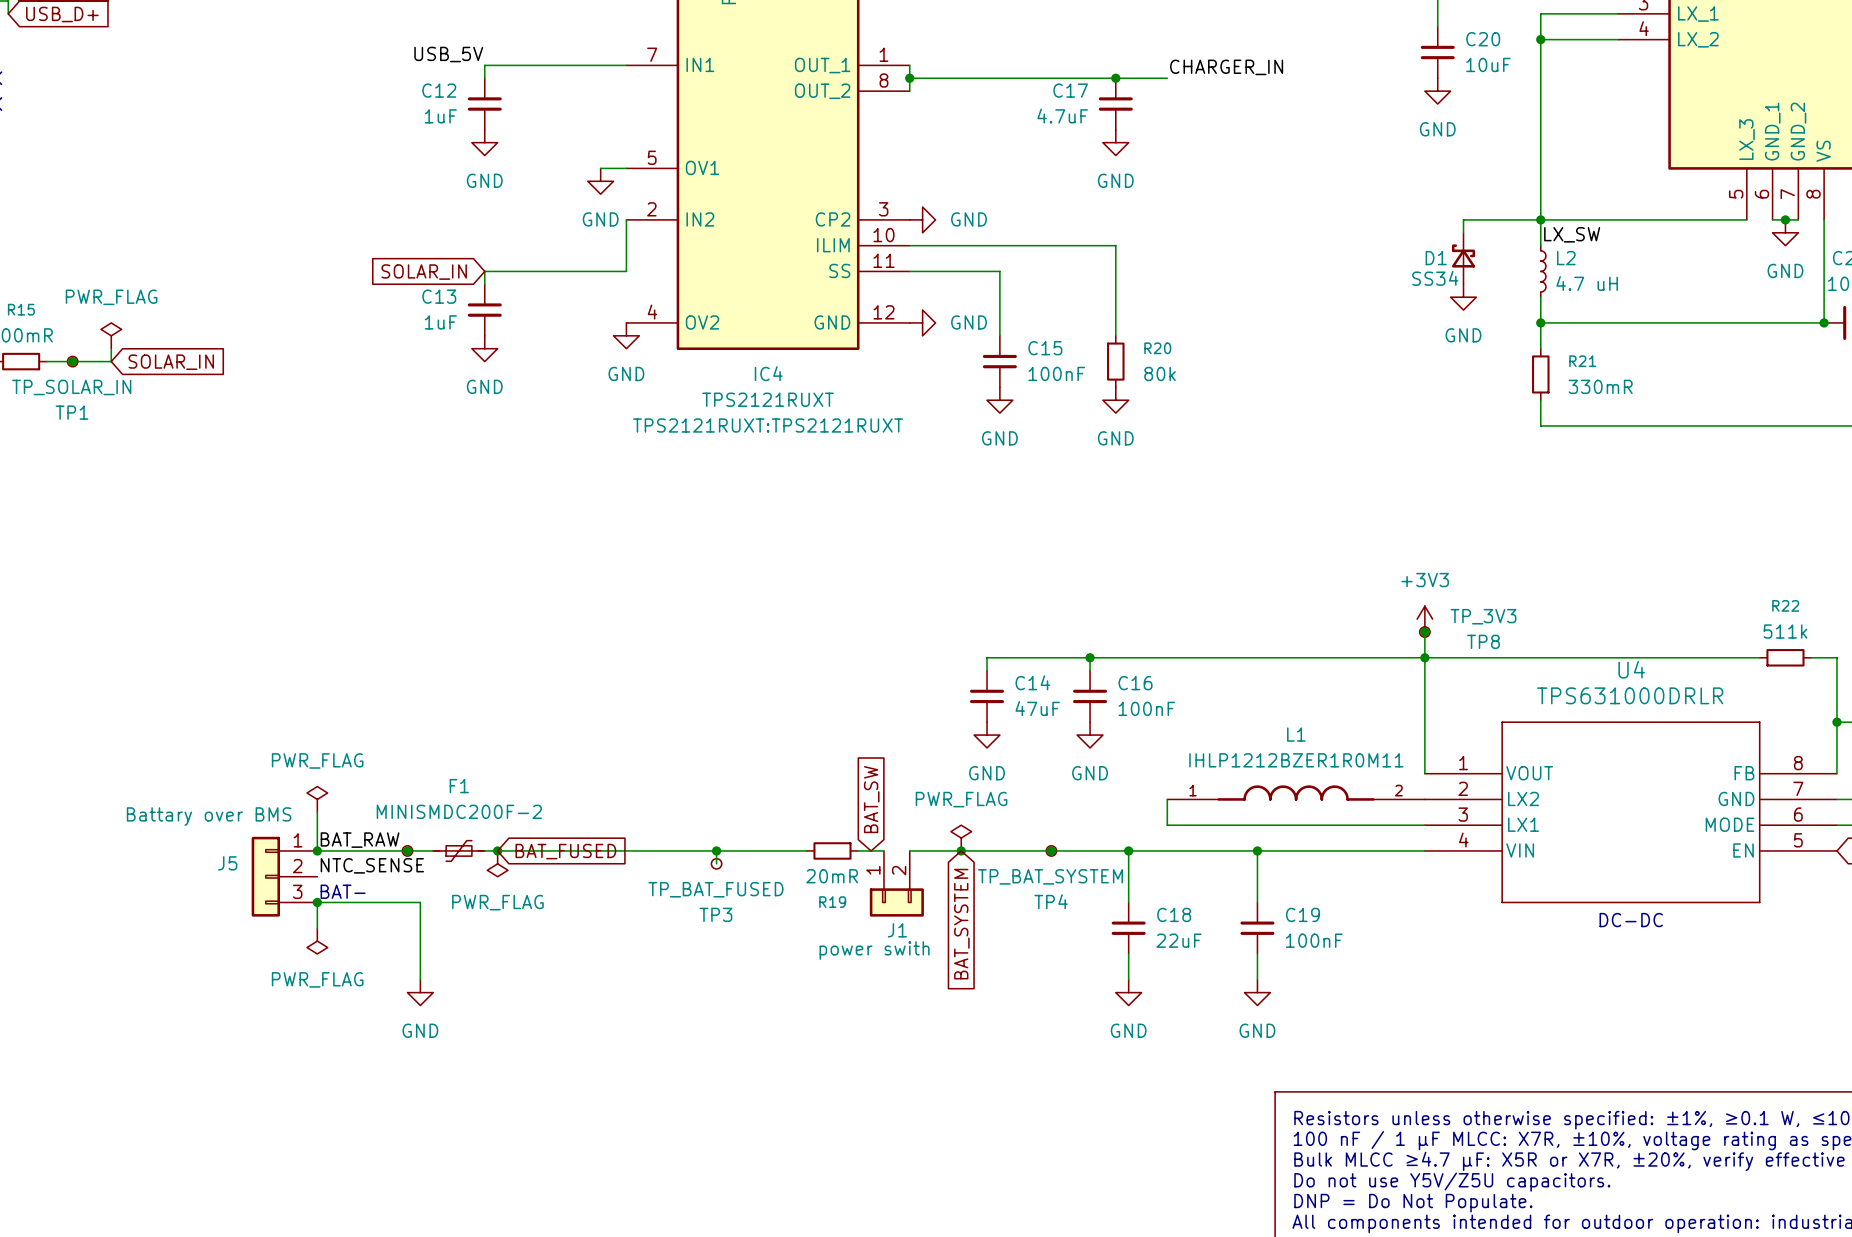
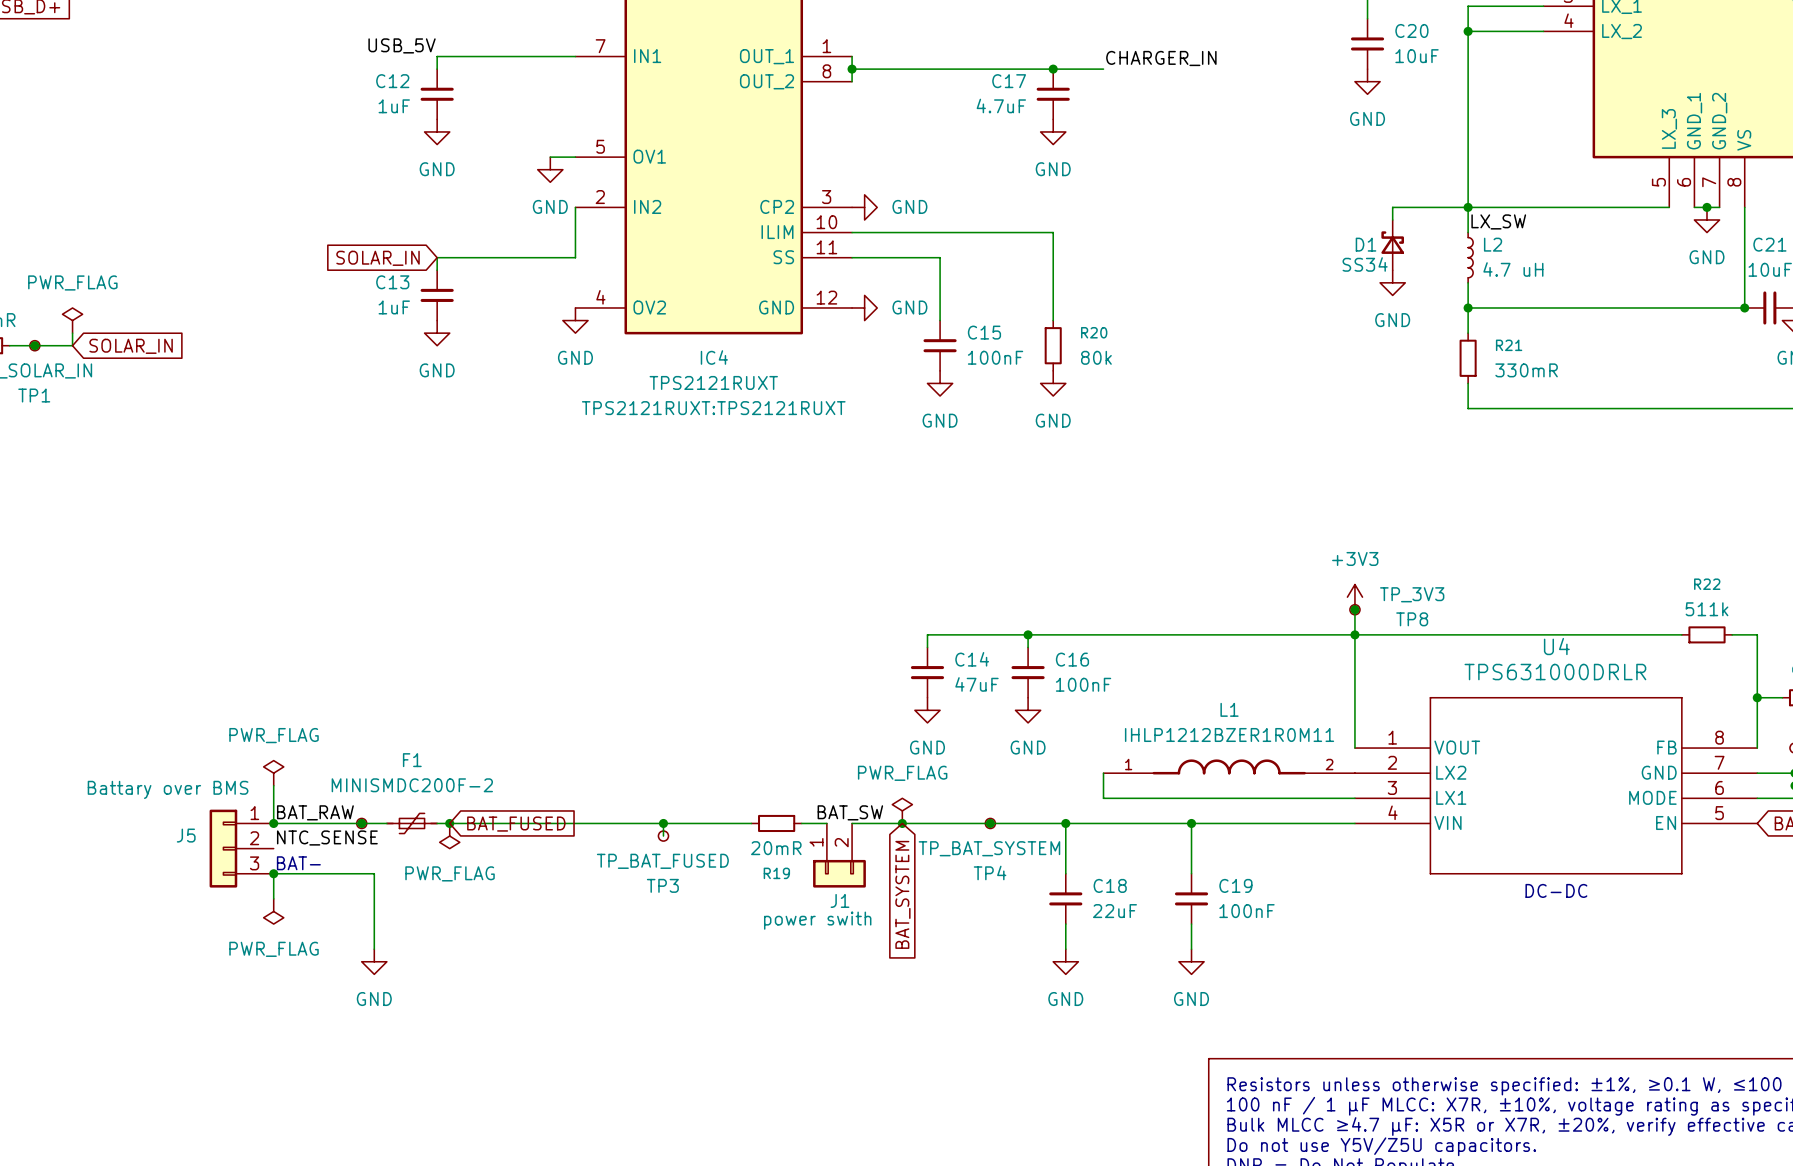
global label: BAT_SW (871, 799) -> none
label: none -> BAT_SW (850, 812)

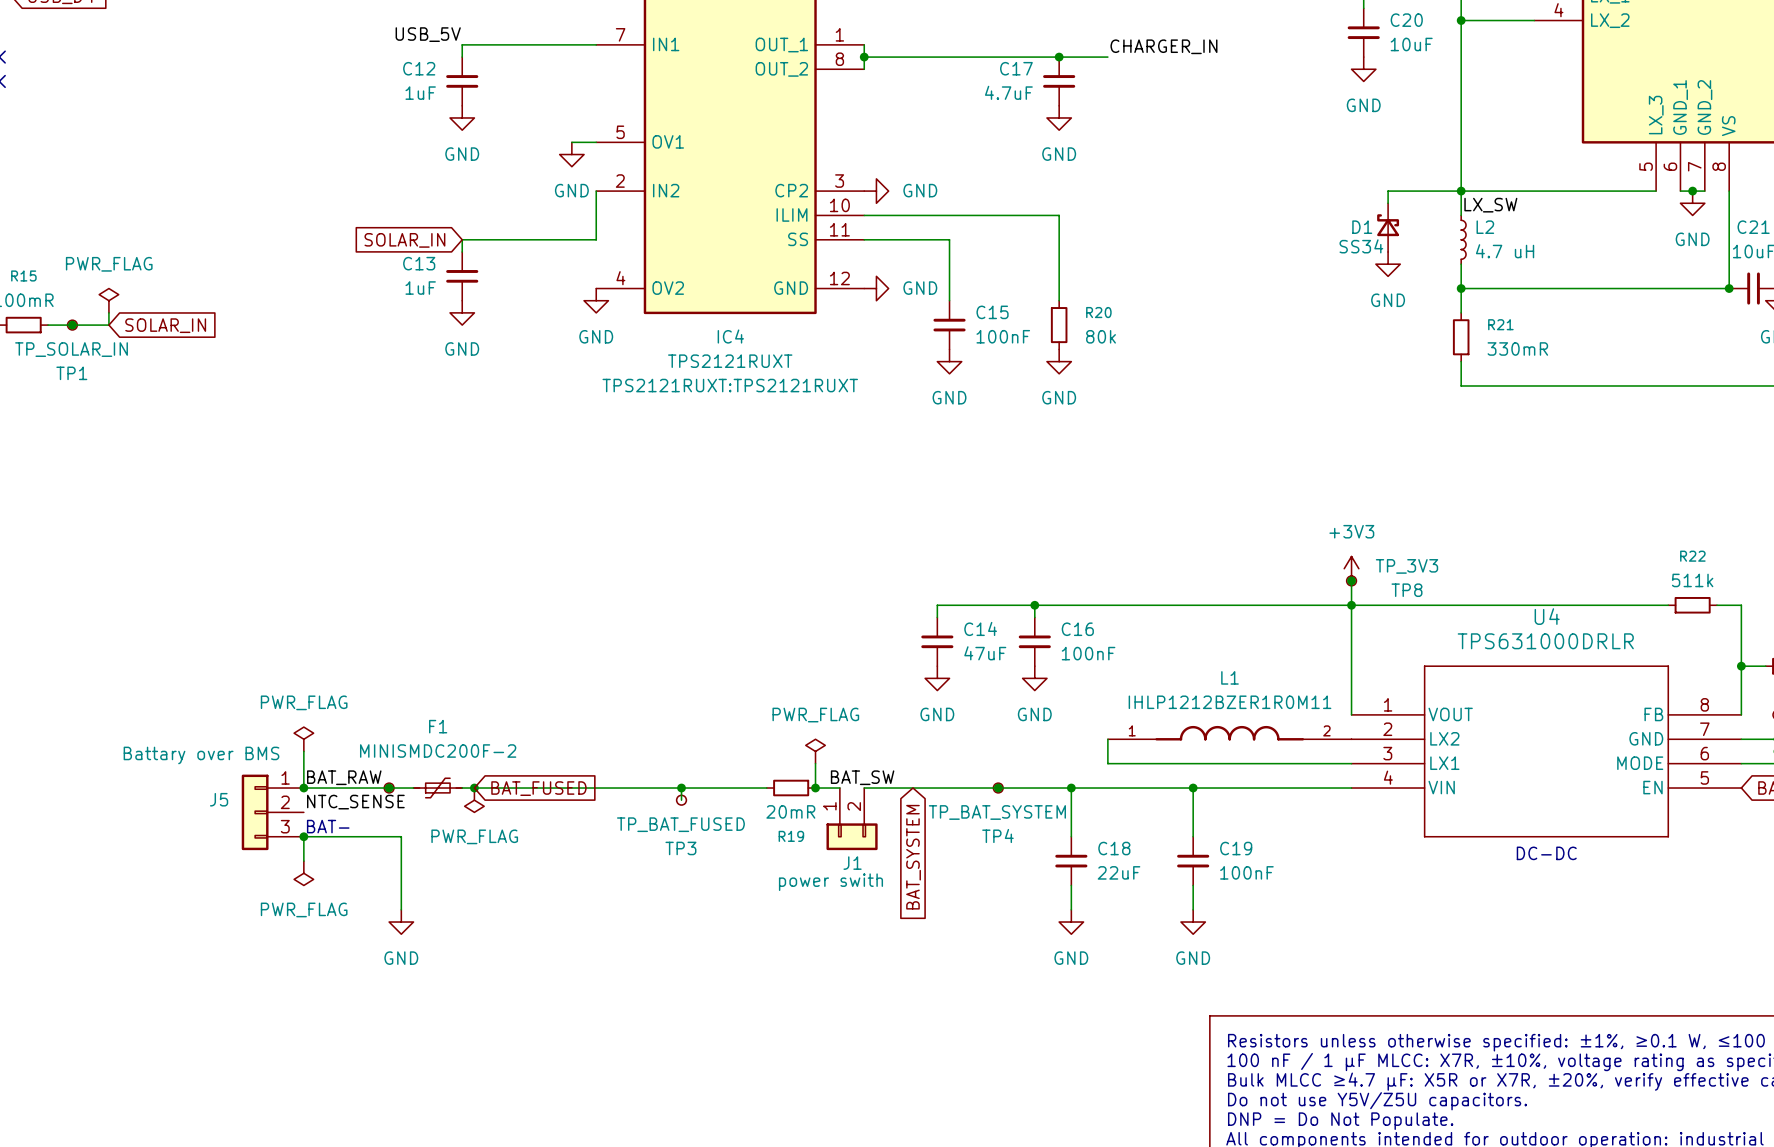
wire: none -> (815, 763) (815, 788)
power symbol position: PWR_FLAG (902, 810) -> PWR_FLAG (815, 751)
junction: none -> (815, 788)
junction: (902, 823) -> none

